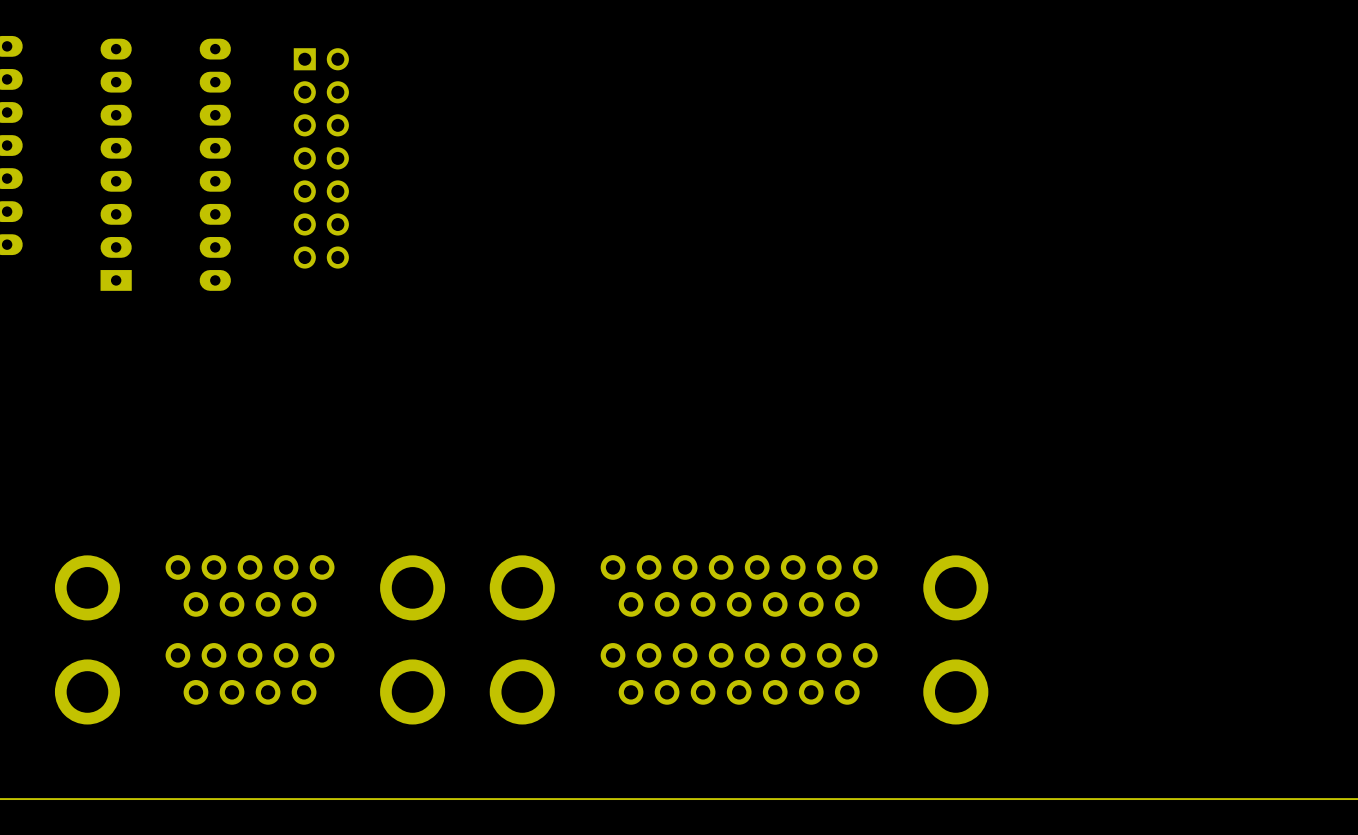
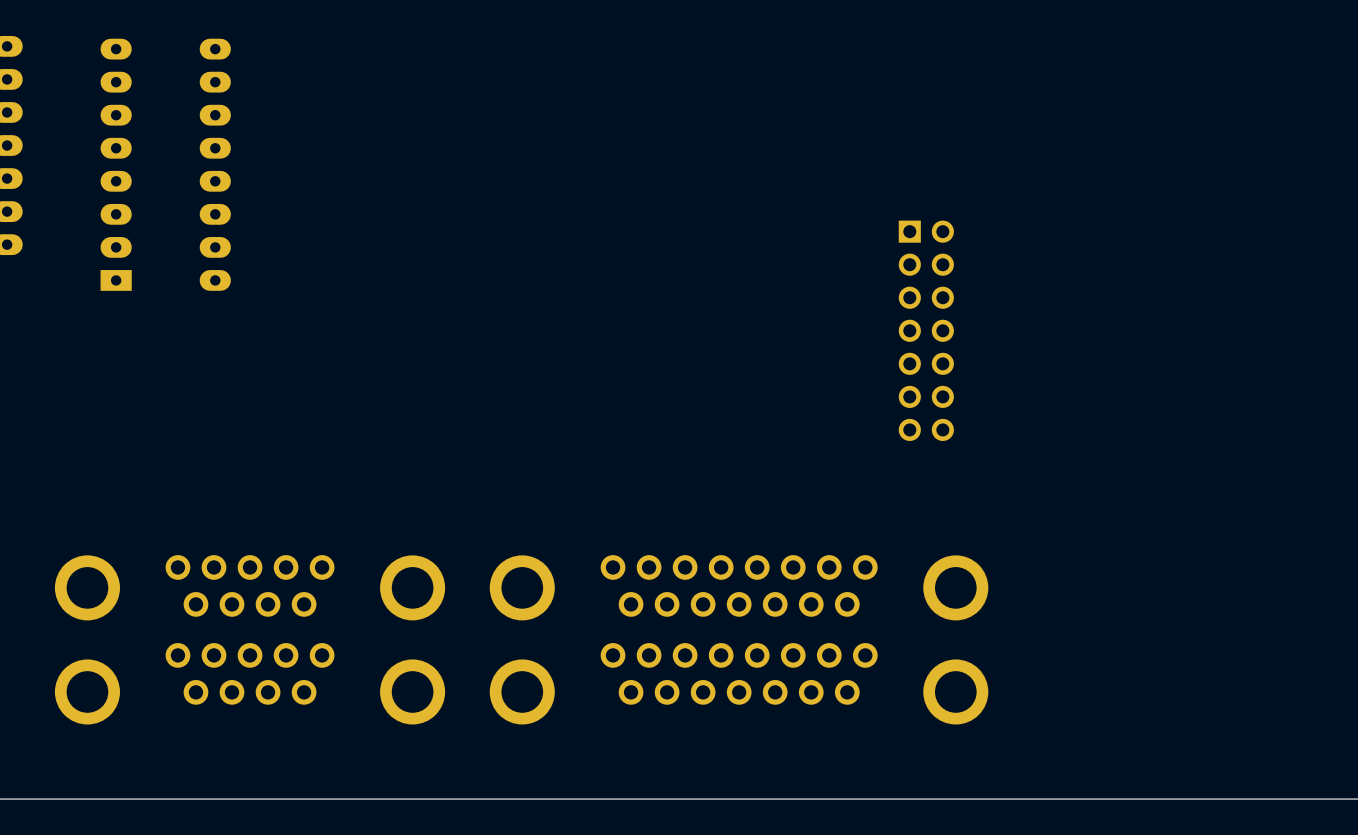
part: (321, 158) -> none
part: none -> (926, 330)

